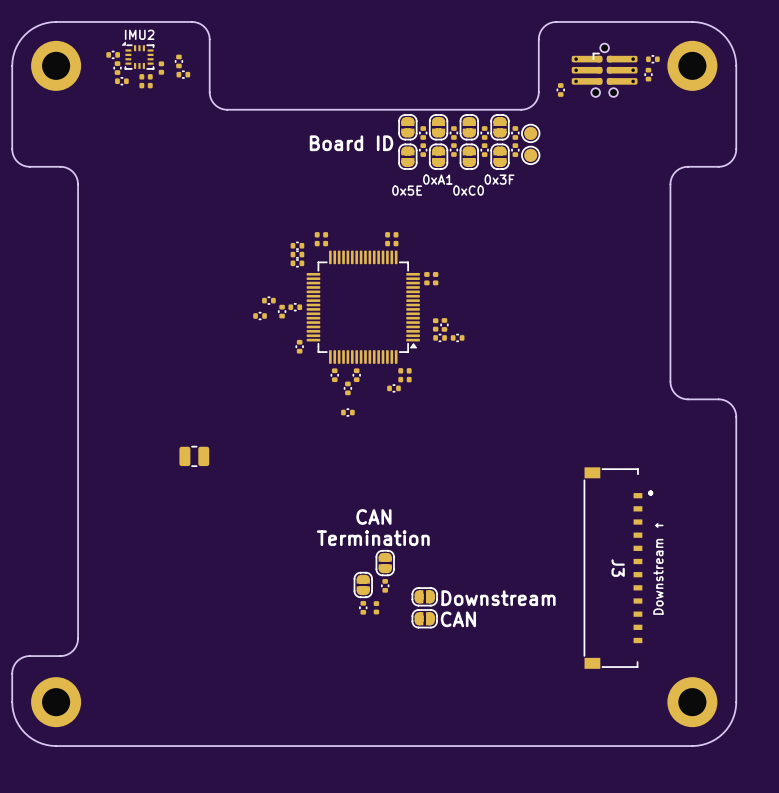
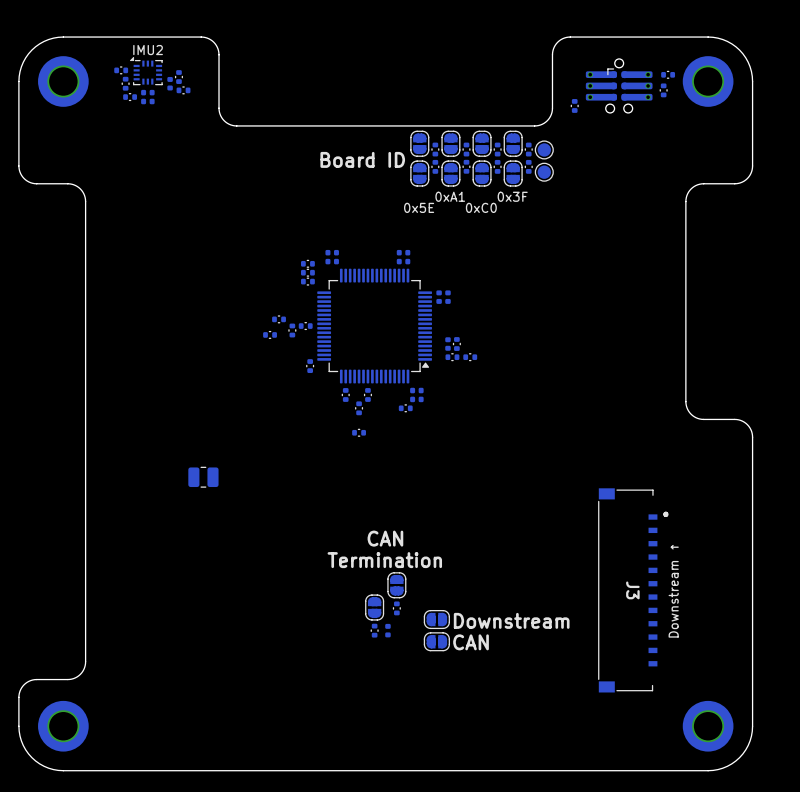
part: none -> (178, 77)
part: (178, 61) -> none
part: none -> (183, 90)
part: (183, 74) -> none
part: none -> (147, 92)
part: (146, 76) -> none
part: none -> (147, 101)
part: (146, 85) -> none

